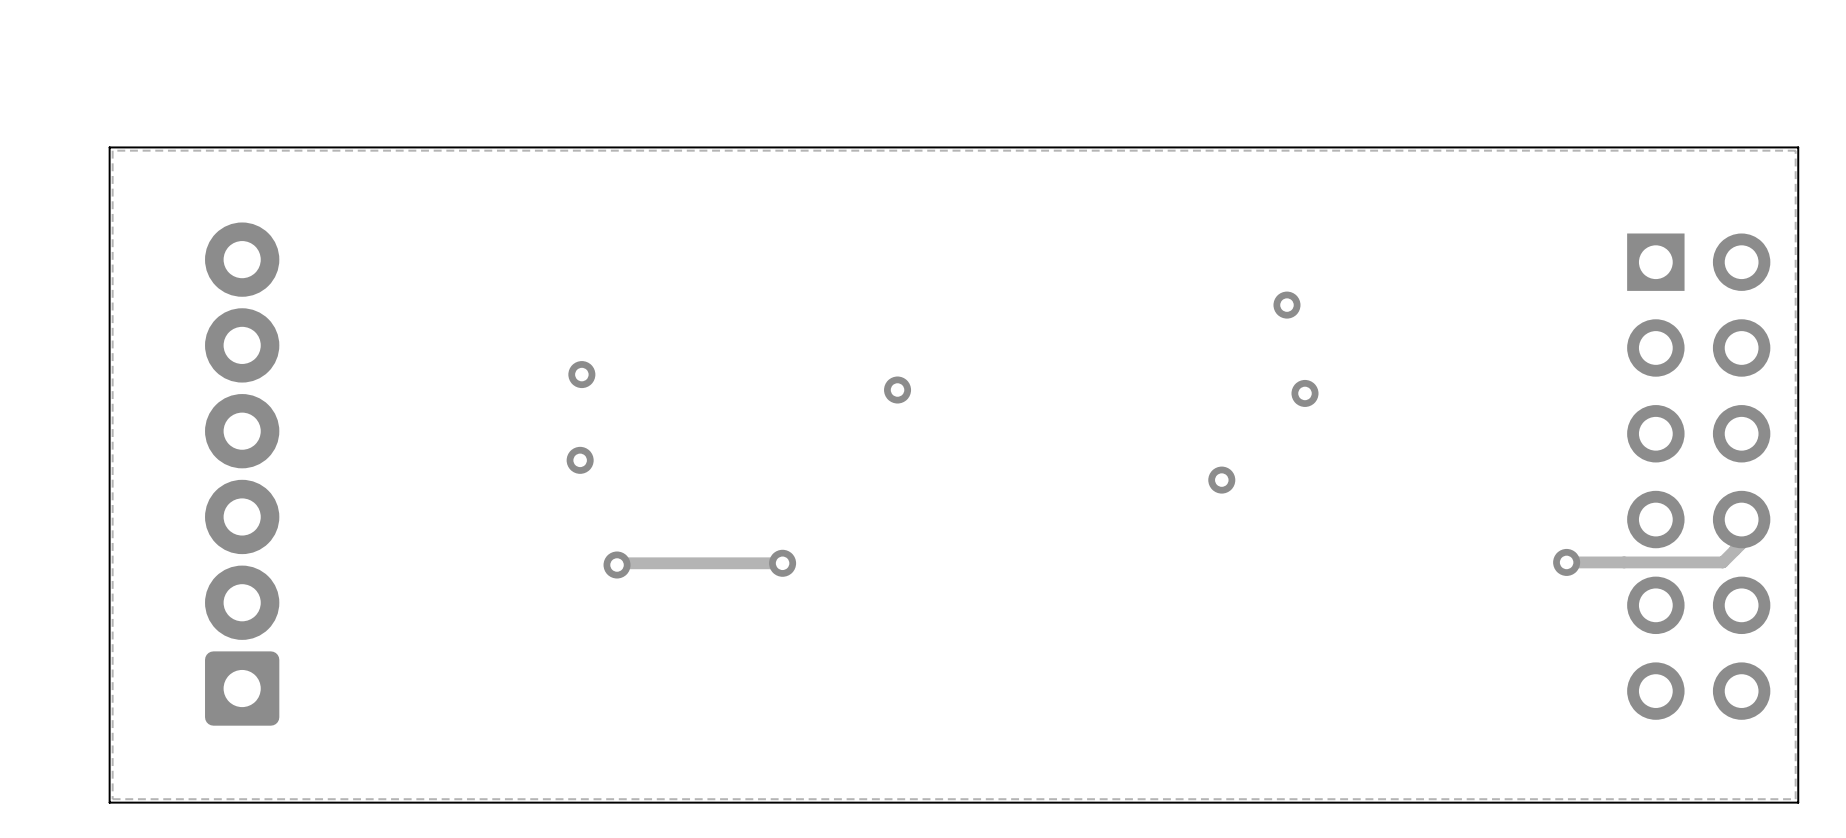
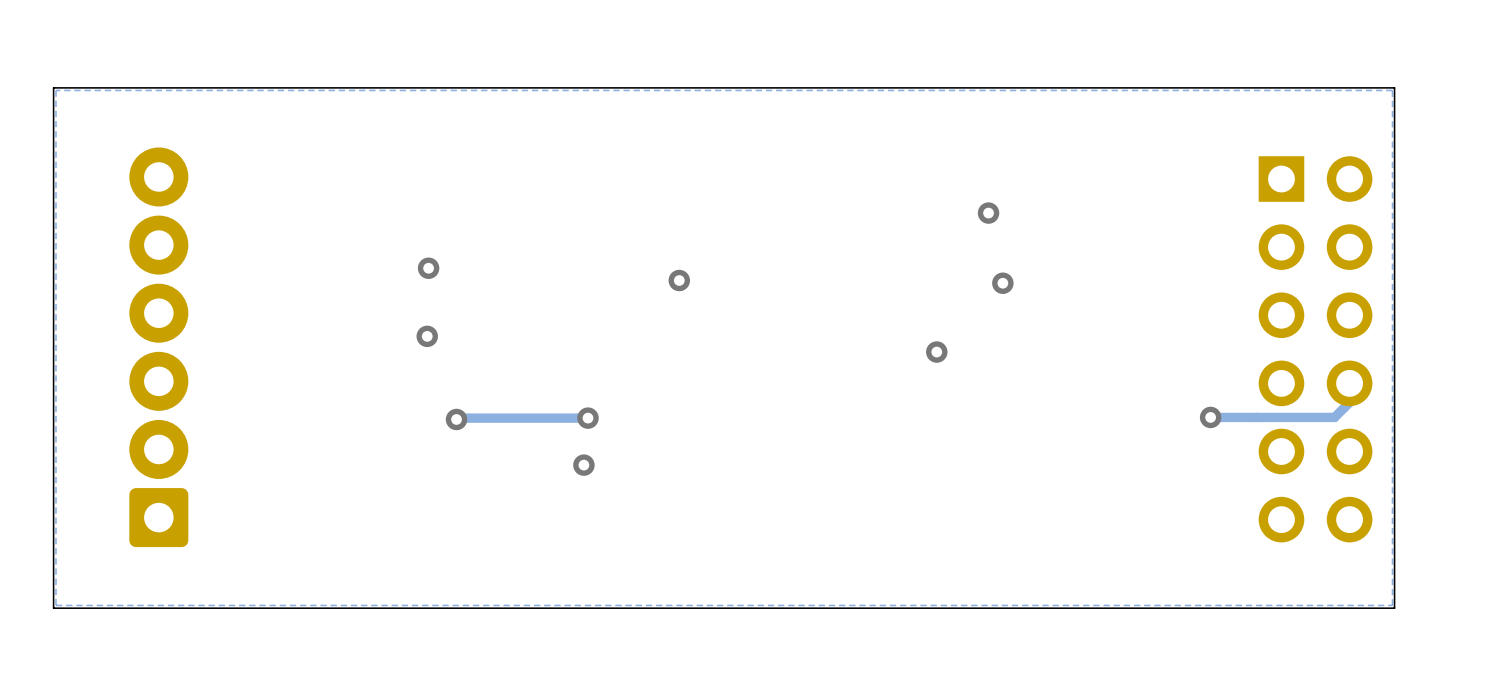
via: none -> (583, 465)

